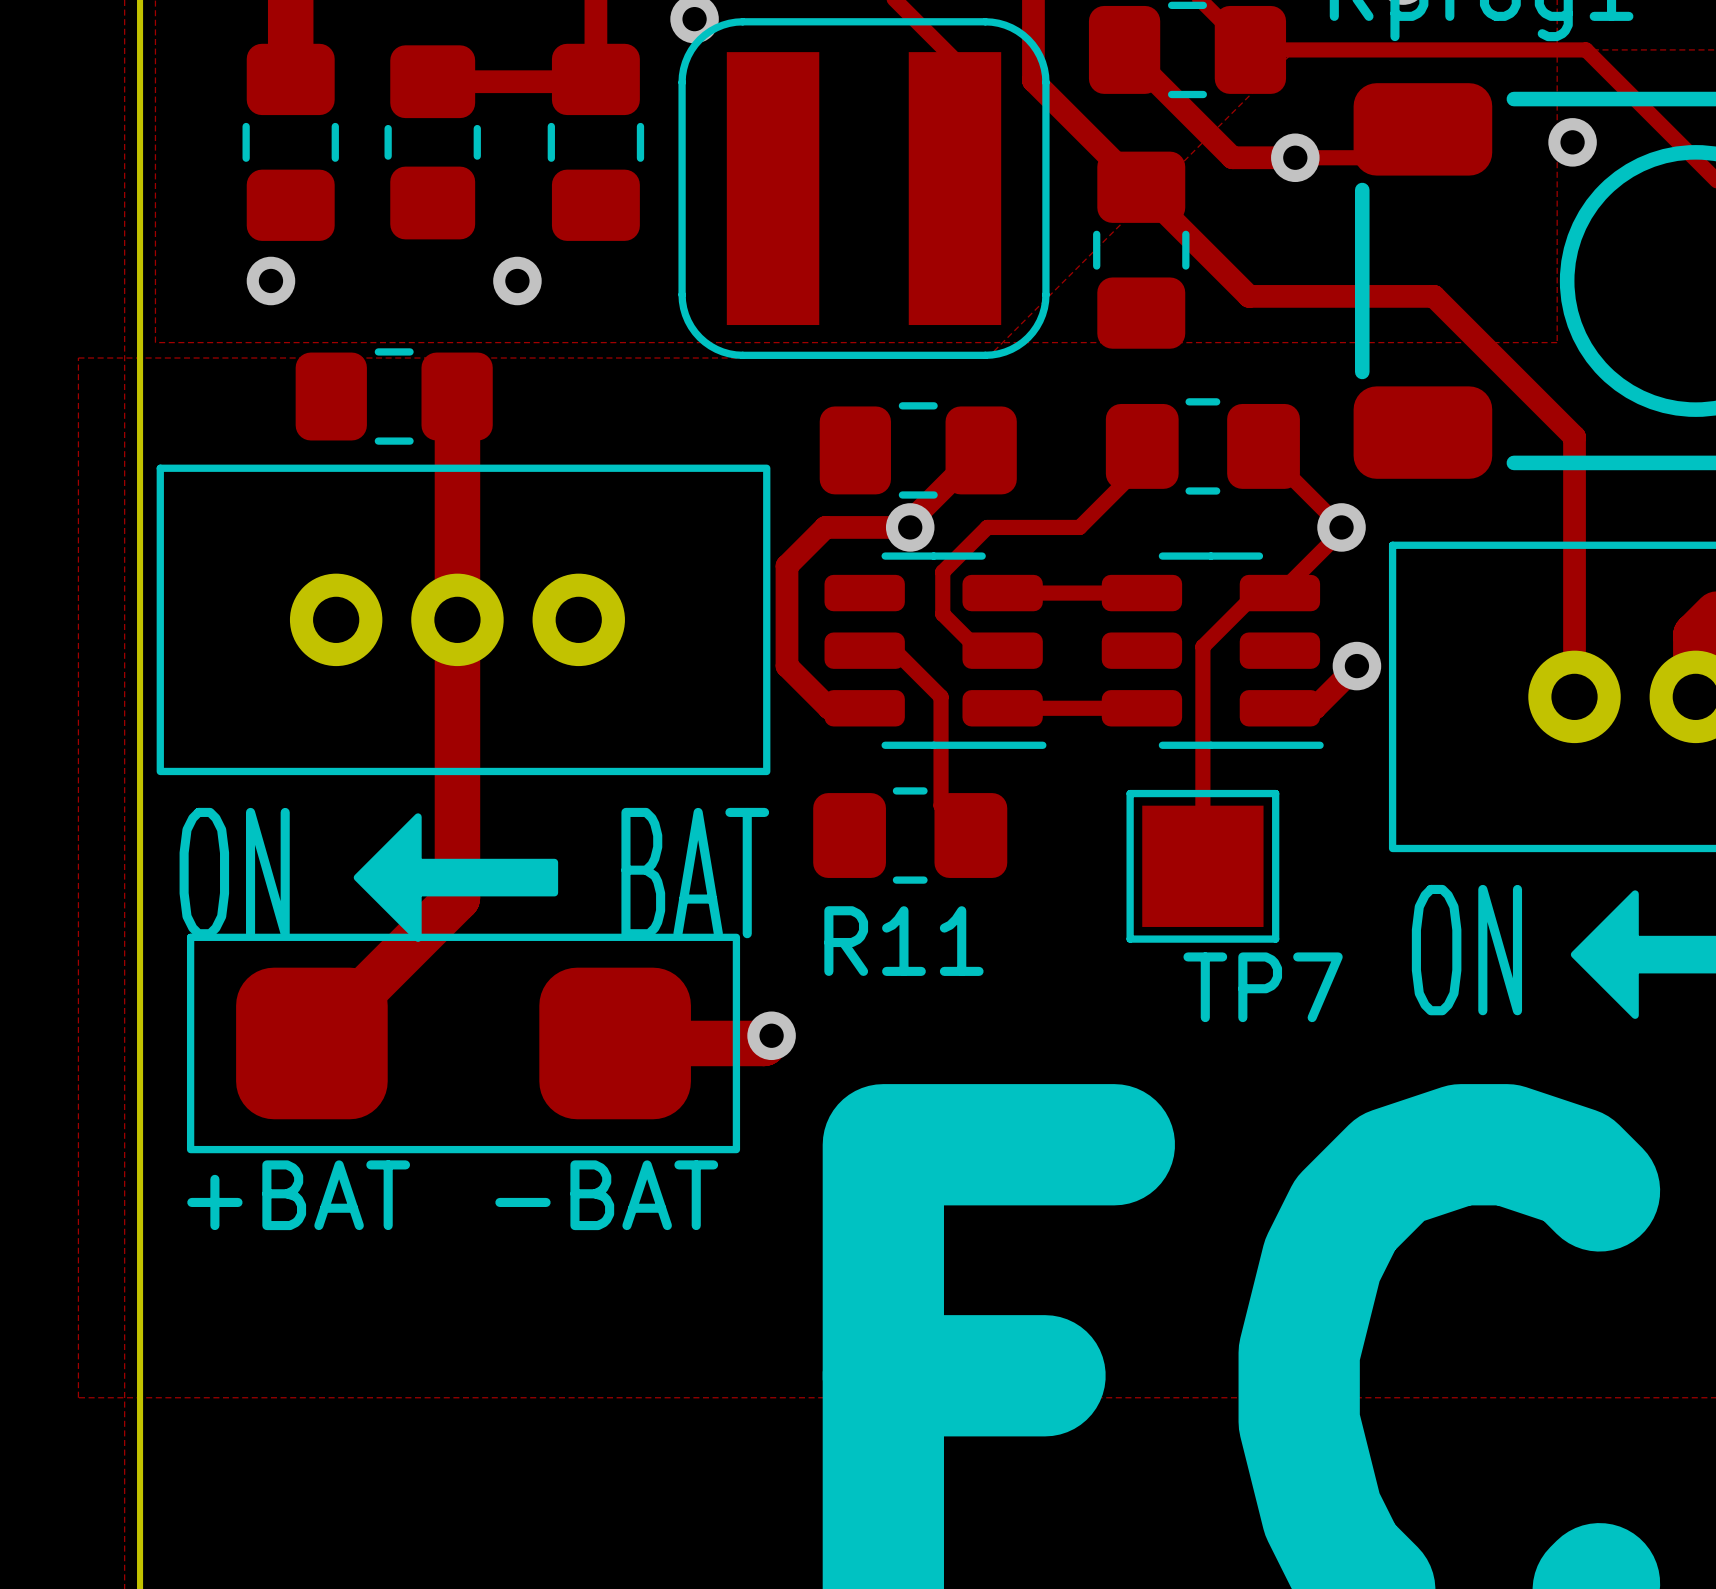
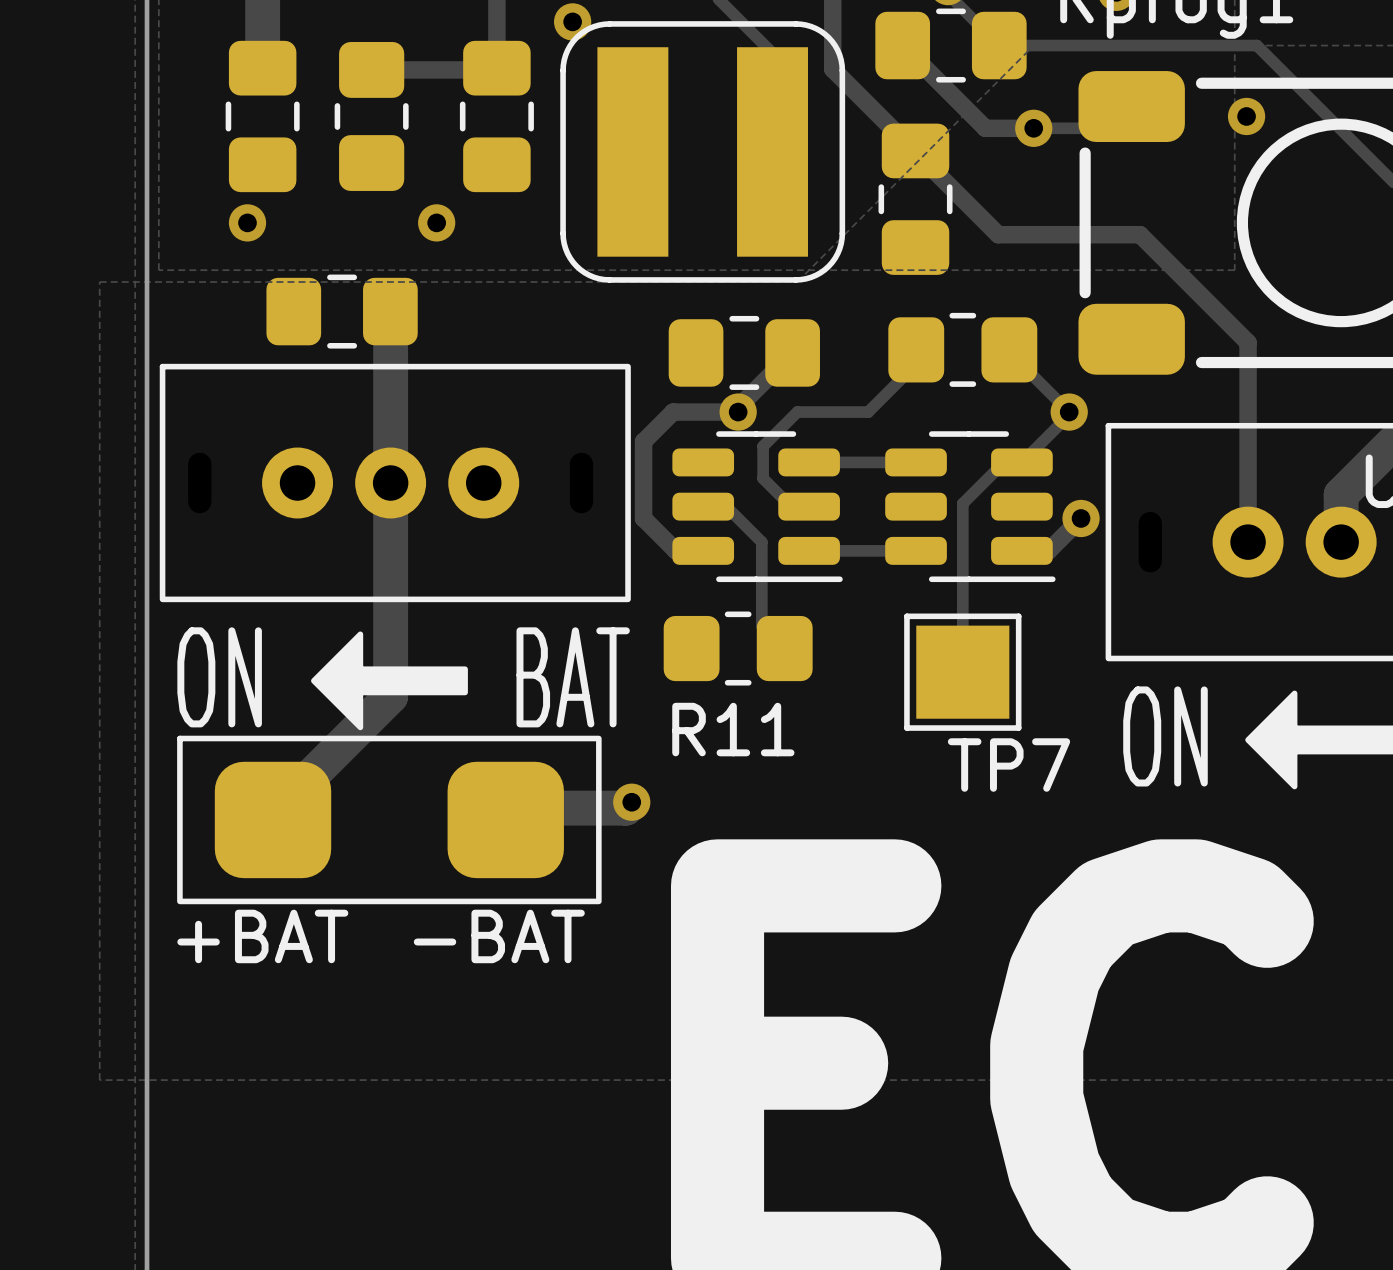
part position: (463, 1043) -> (389, 819)

